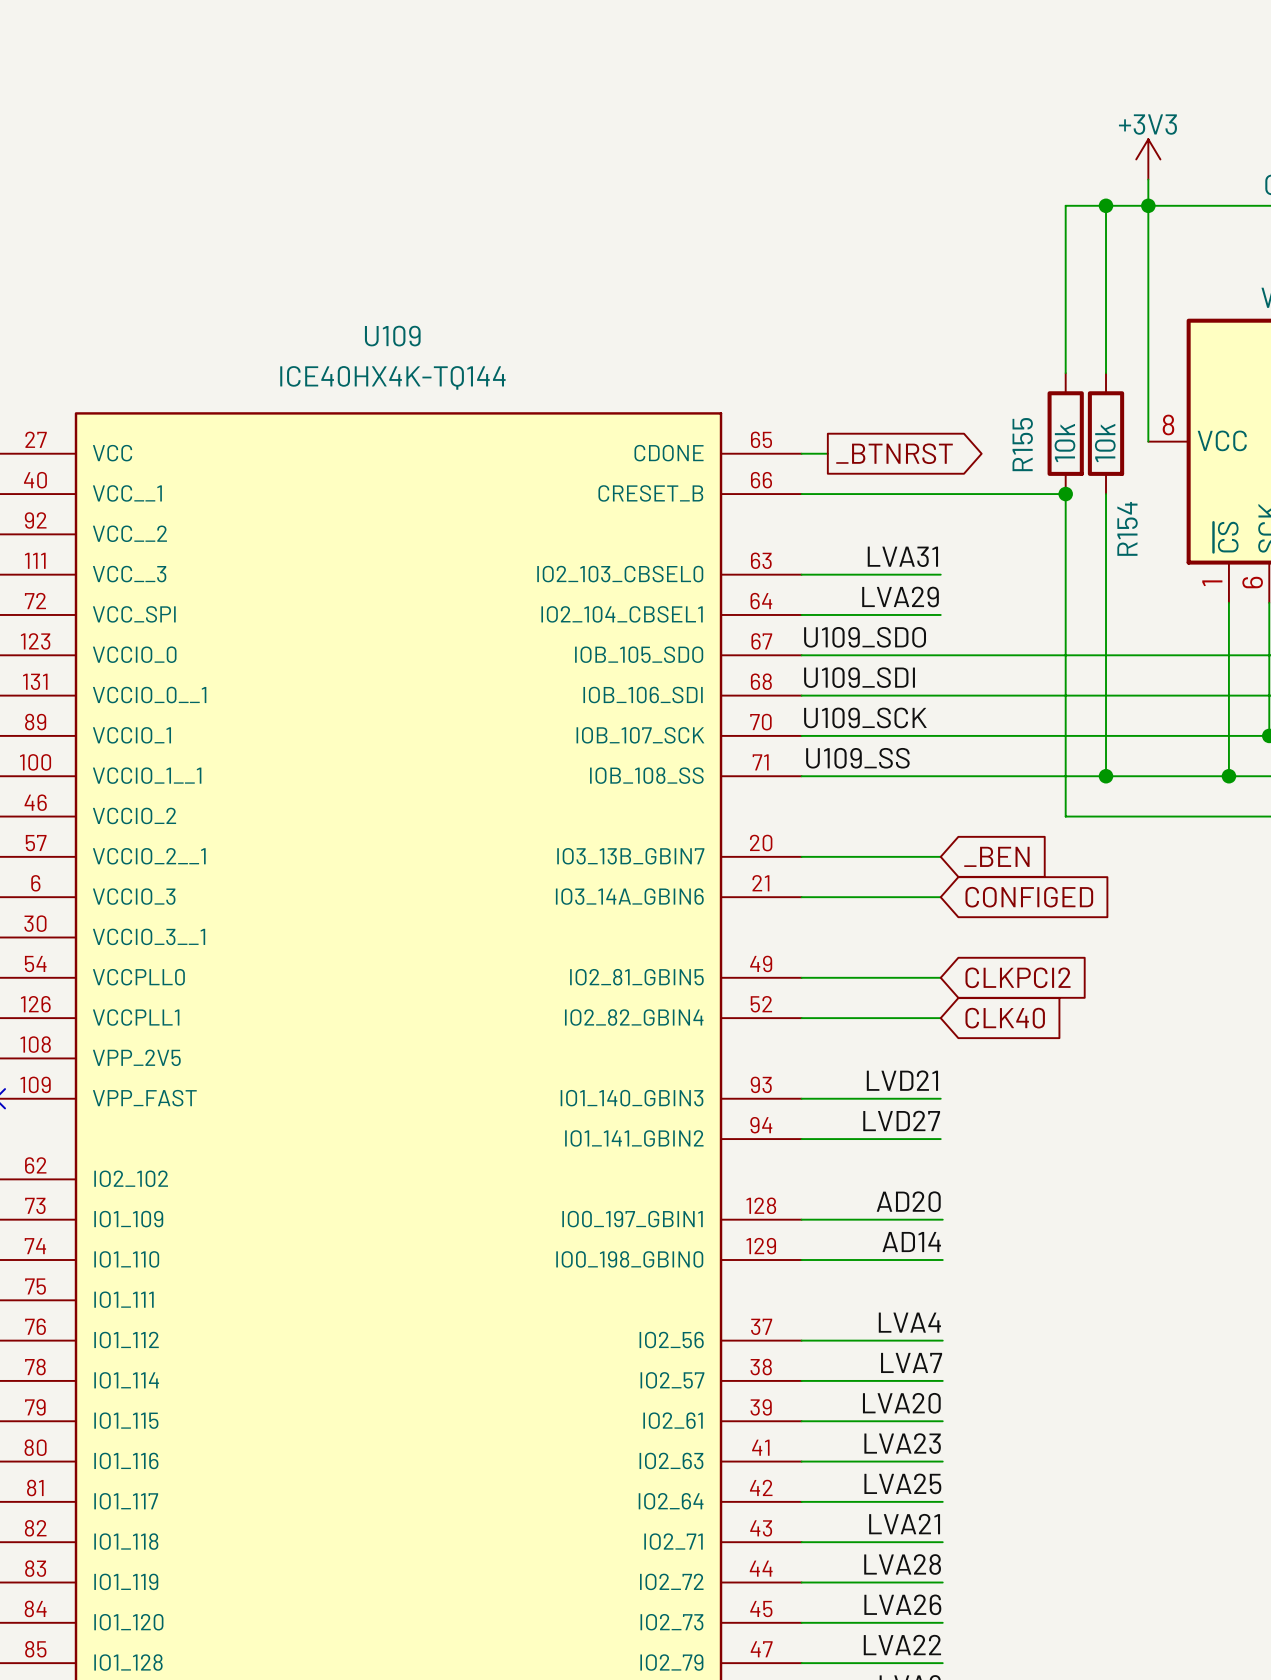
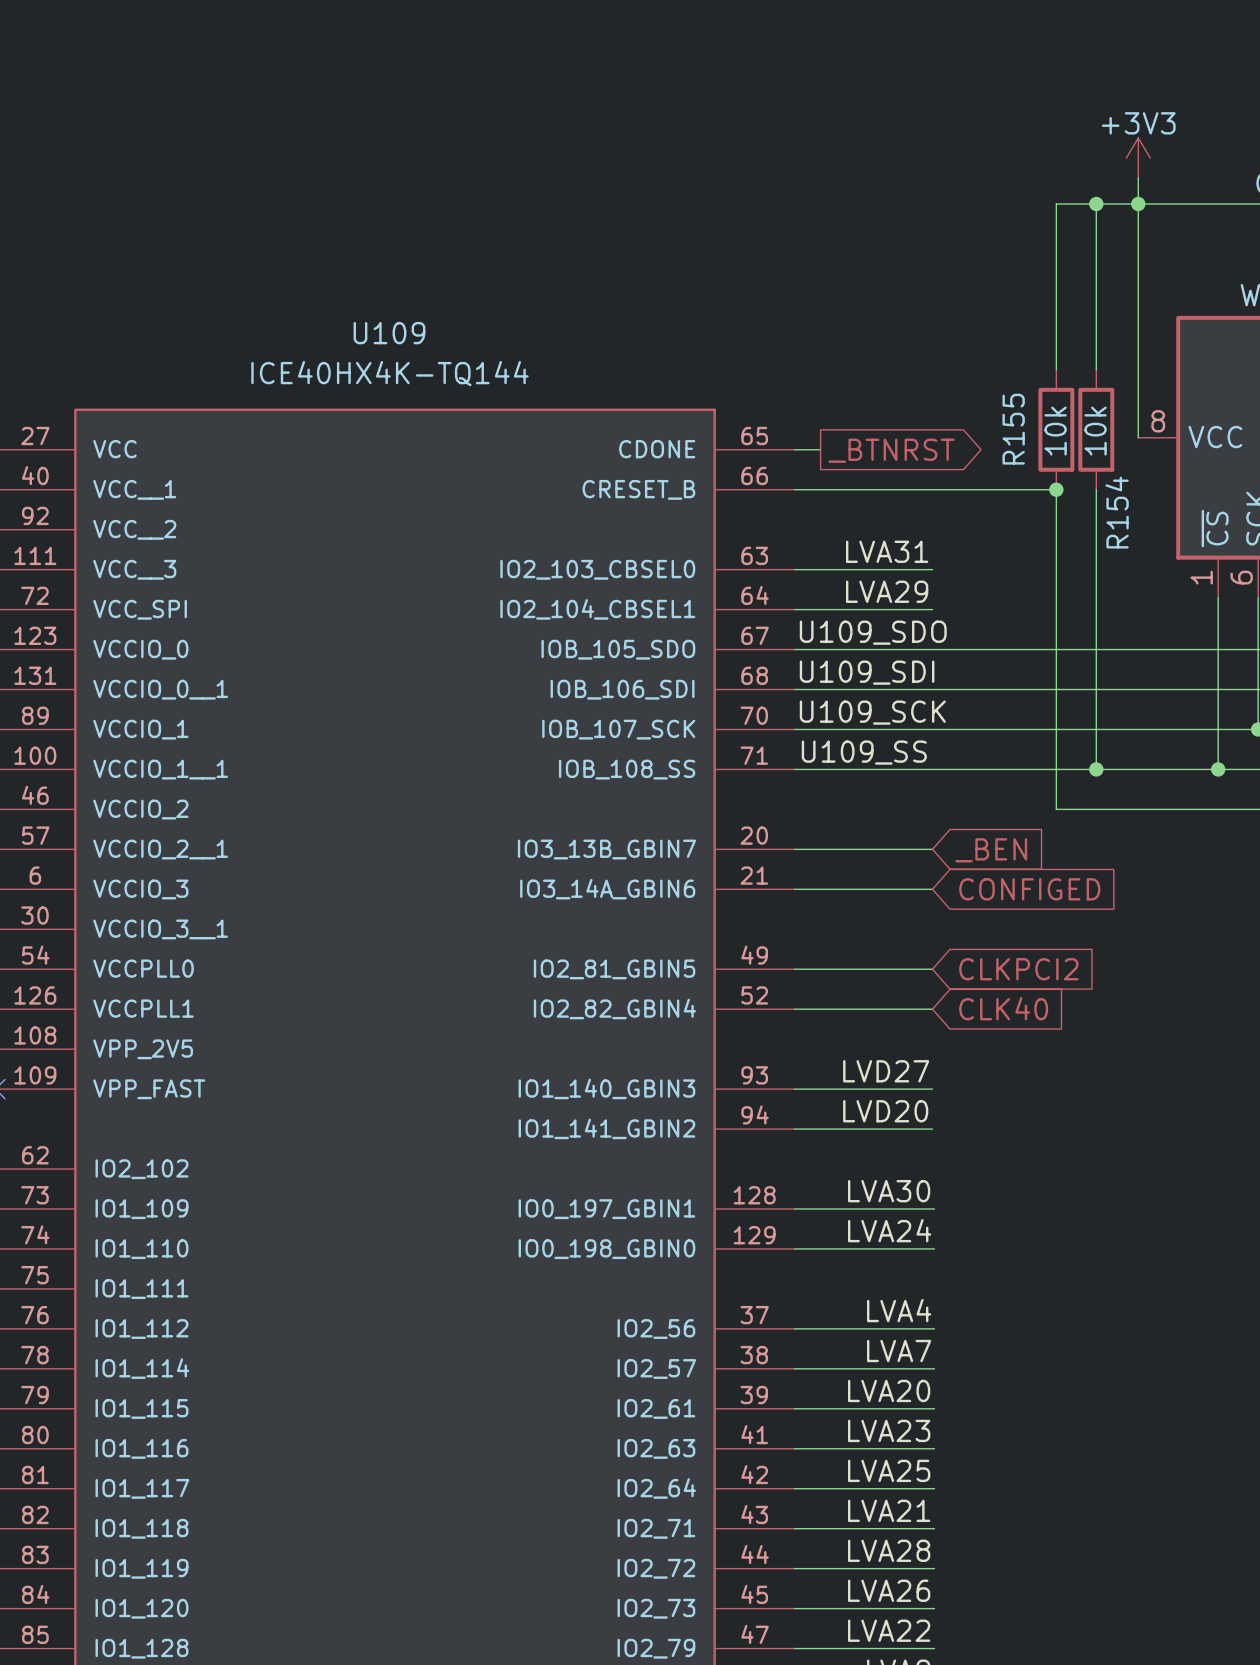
label: LVD21 (902, 1080) -> LVD27 (886, 1071)
label: LVD27 (901, 1120) -> LVD20 (885, 1111)
label: AD20 (908, 1201) -> LVA30 (889, 1191)
label: AD14 (911, 1242) -> LVA24 (889, 1230)

